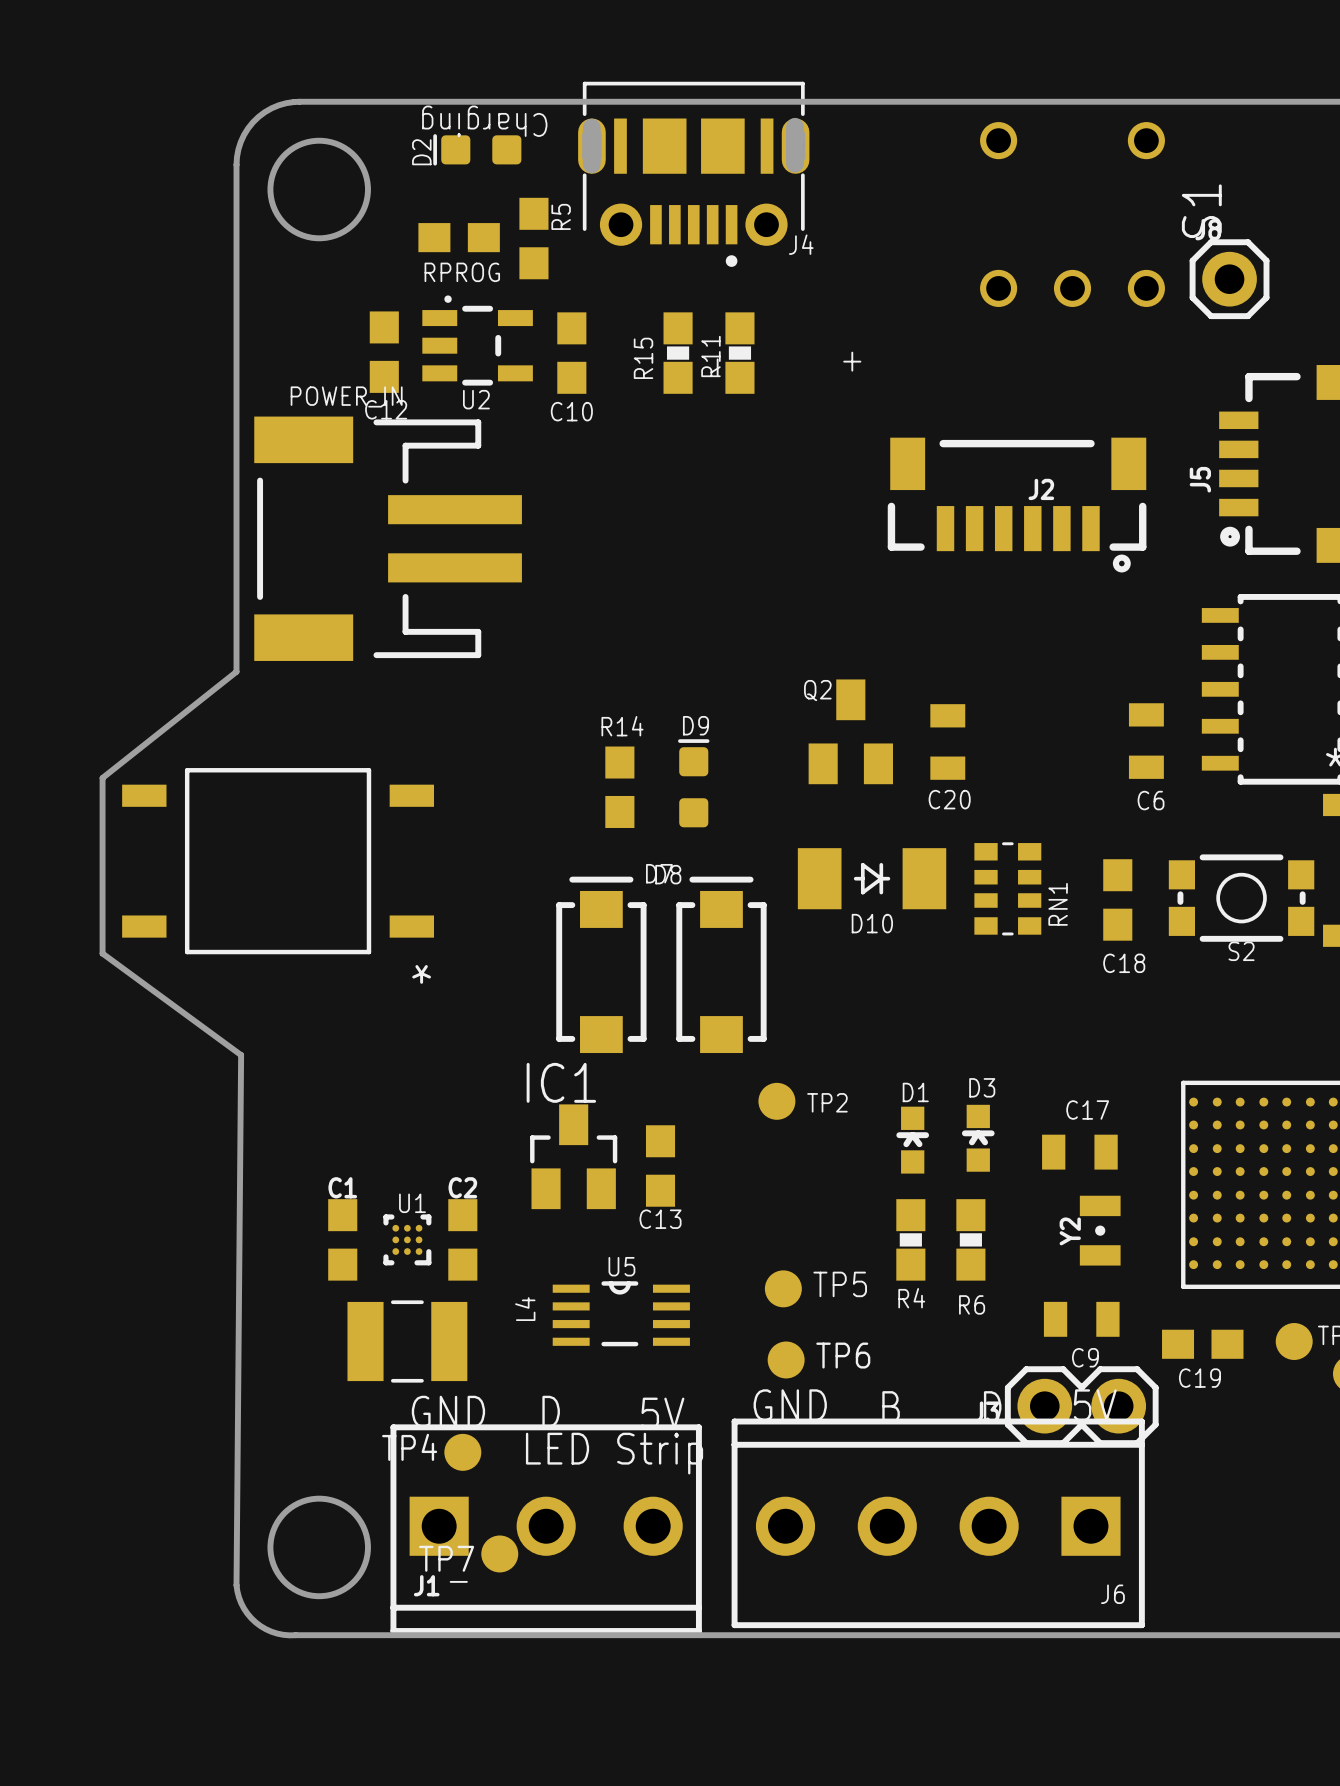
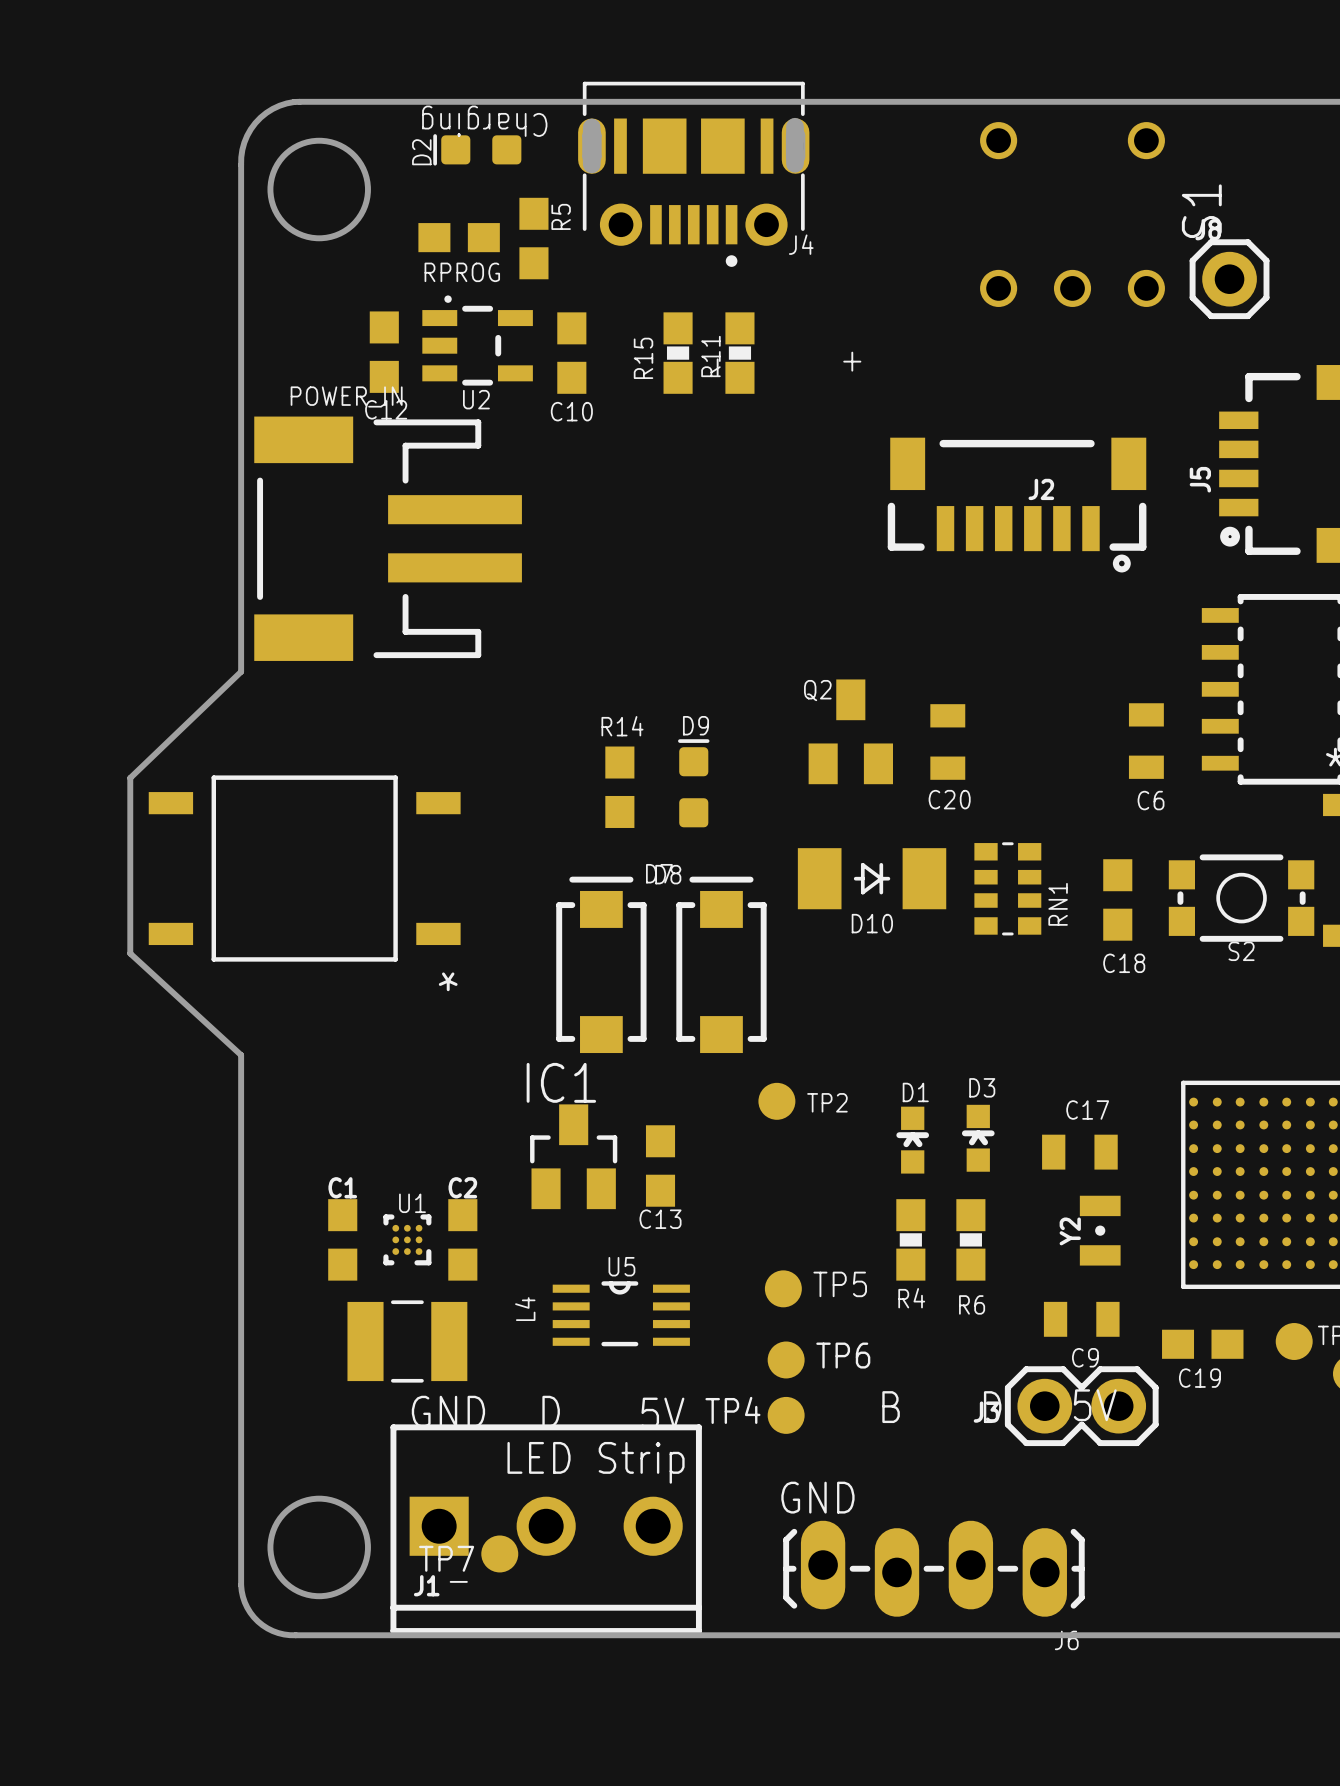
board edge: (299, 101) (278, 105) (258, 116) (244, 134) (236, 157) (236, 671) (102, 778) (102, 953) (241, 1055) (236, 1585) (243, 1608) (255, 1622) (277, 1633) (295, 1635) -> (299, 101) (279, 105) (260, 117) (247, 135) (241, 157) (241, 671) (130, 778) (130, 953) (241, 1055) (241, 1585) (244, 1602) (258, 1621) (278, 1633) (295, 1635)
part position: (278, 861) -> (304, 868)
text position: GND (790, 1405) -> GND (817, 1497)
J6 footprint: [731, 1418, 1145, 1629] -> [783, 1520, 1085, 1617]
TP4 position: (462, 1452) -> (786, 1415)
text position: LED Strip (614, 1453) -> LED Strip (596, 1462)

